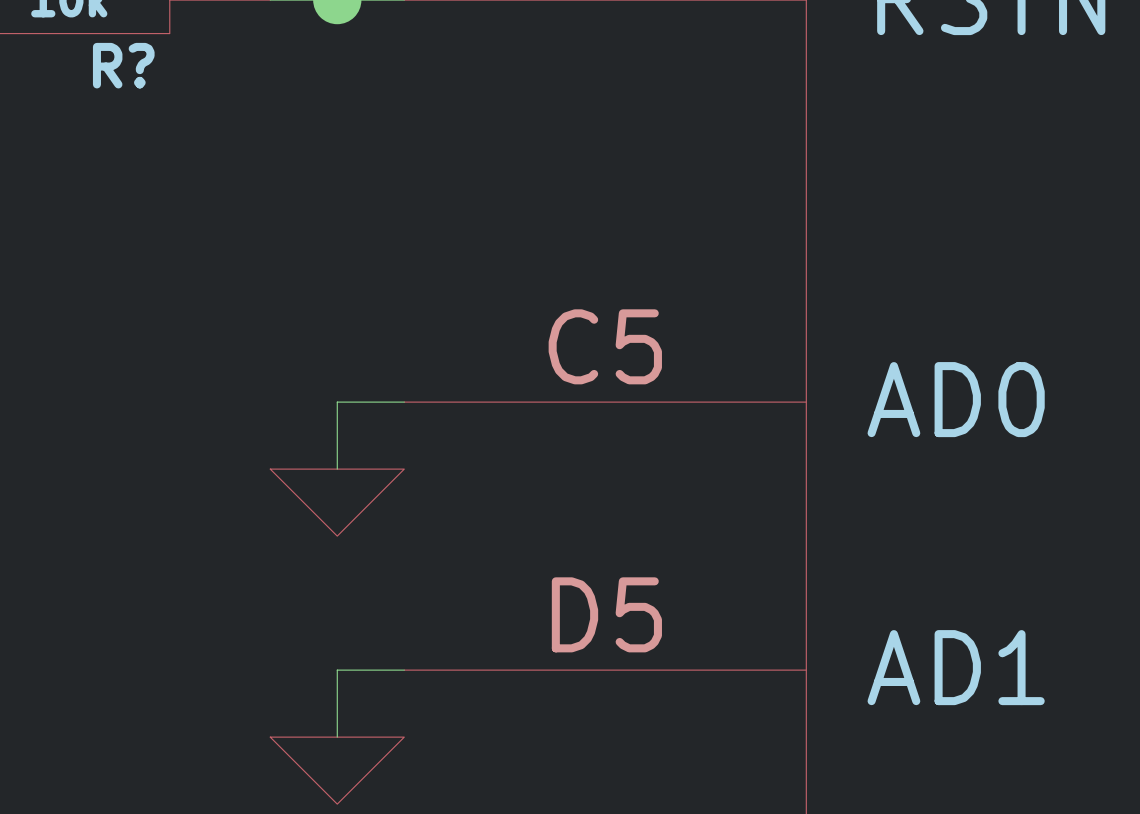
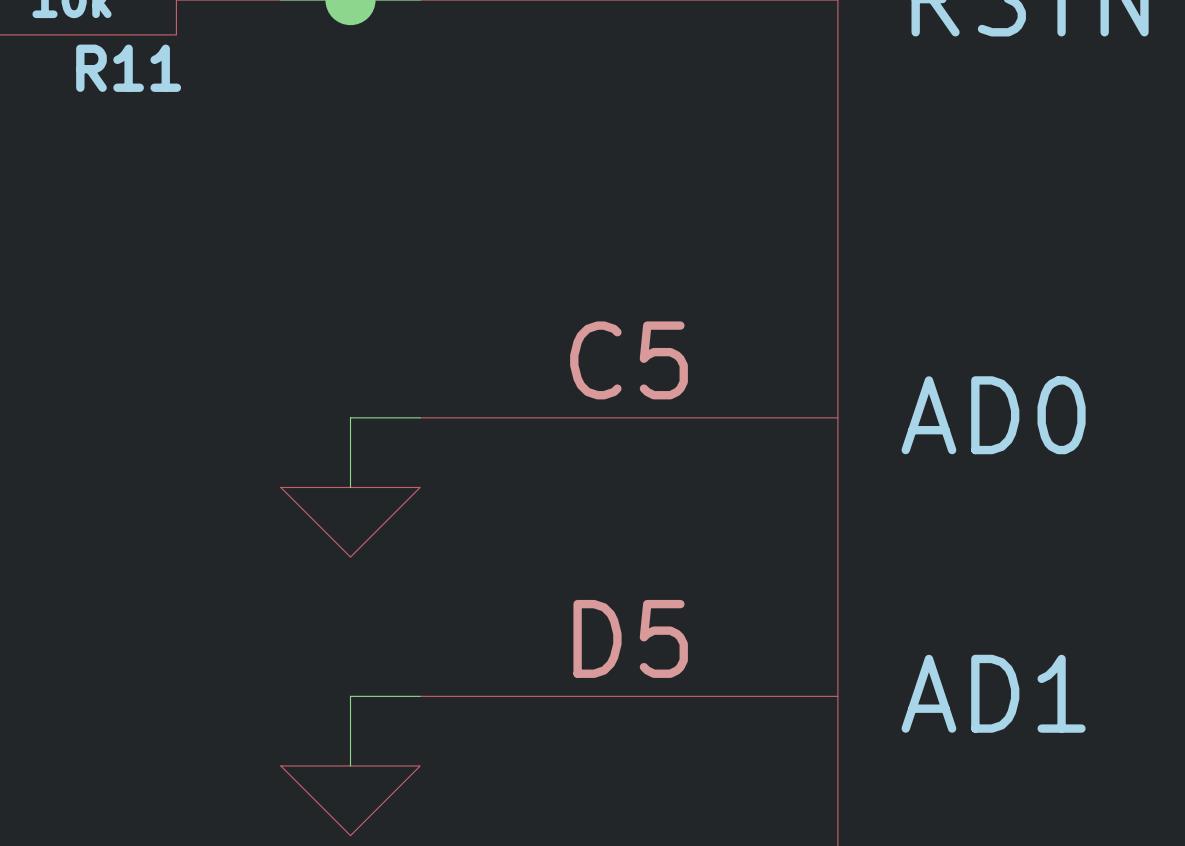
R? name: R? (123, 65) -> R11 (128, 68)

